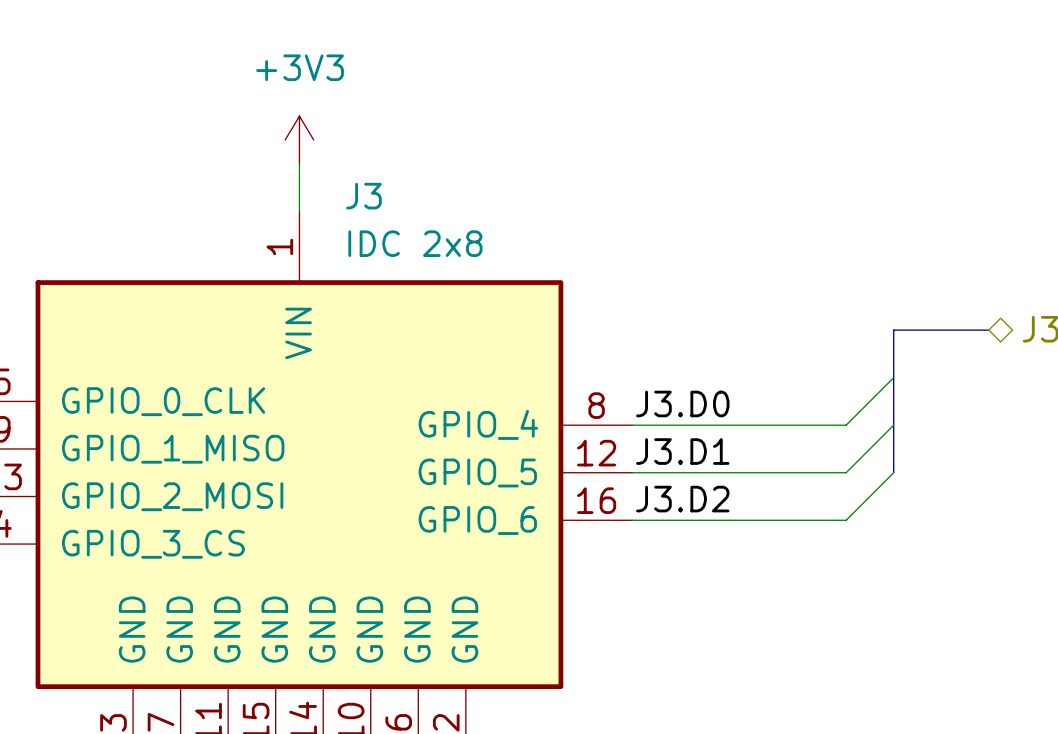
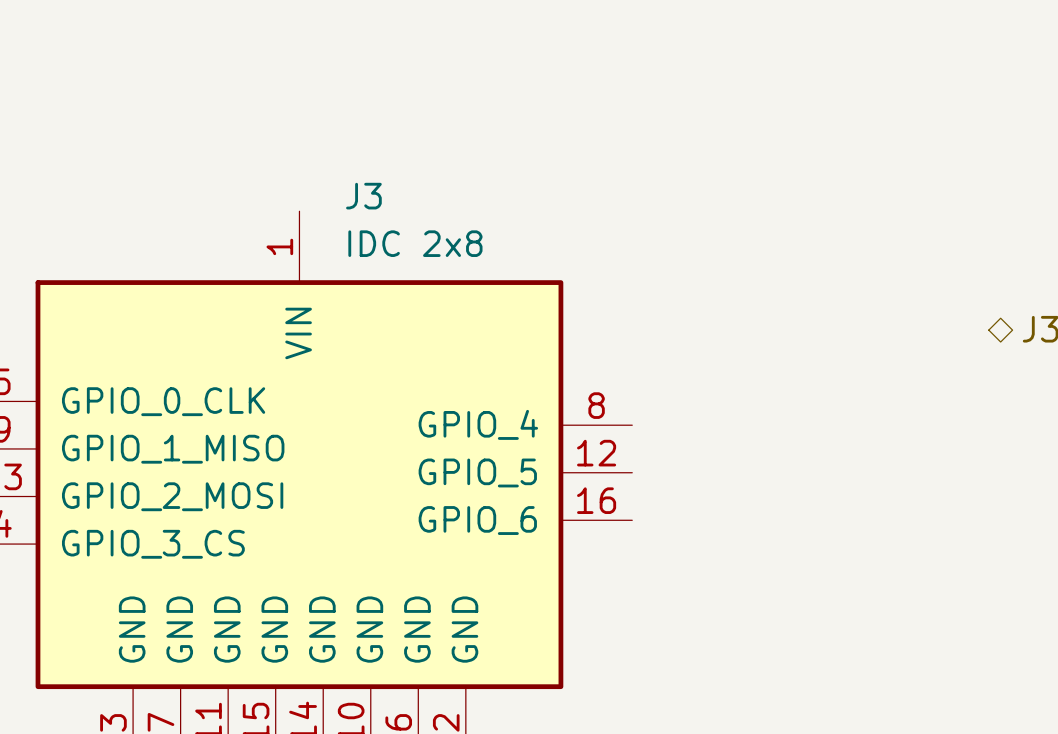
power symbol: +3V3 (299, 139) -> none
wire: (299, 163) (299, 211) -> none
bus: (988, 330) (893, 330) (893, 472) -> none
wire: (893, 377) (846, 425) (632, 425) -> none
label: J3.D0 (682, 403) -> none
wire: (893, 425) (846, 472) (632, 472) -> none
label: J3.D1 (682, 451) -> none
wire: (893, 472) (846, 520) (632, 520) -> none
label: J3.D2 (682, 499) -> none

